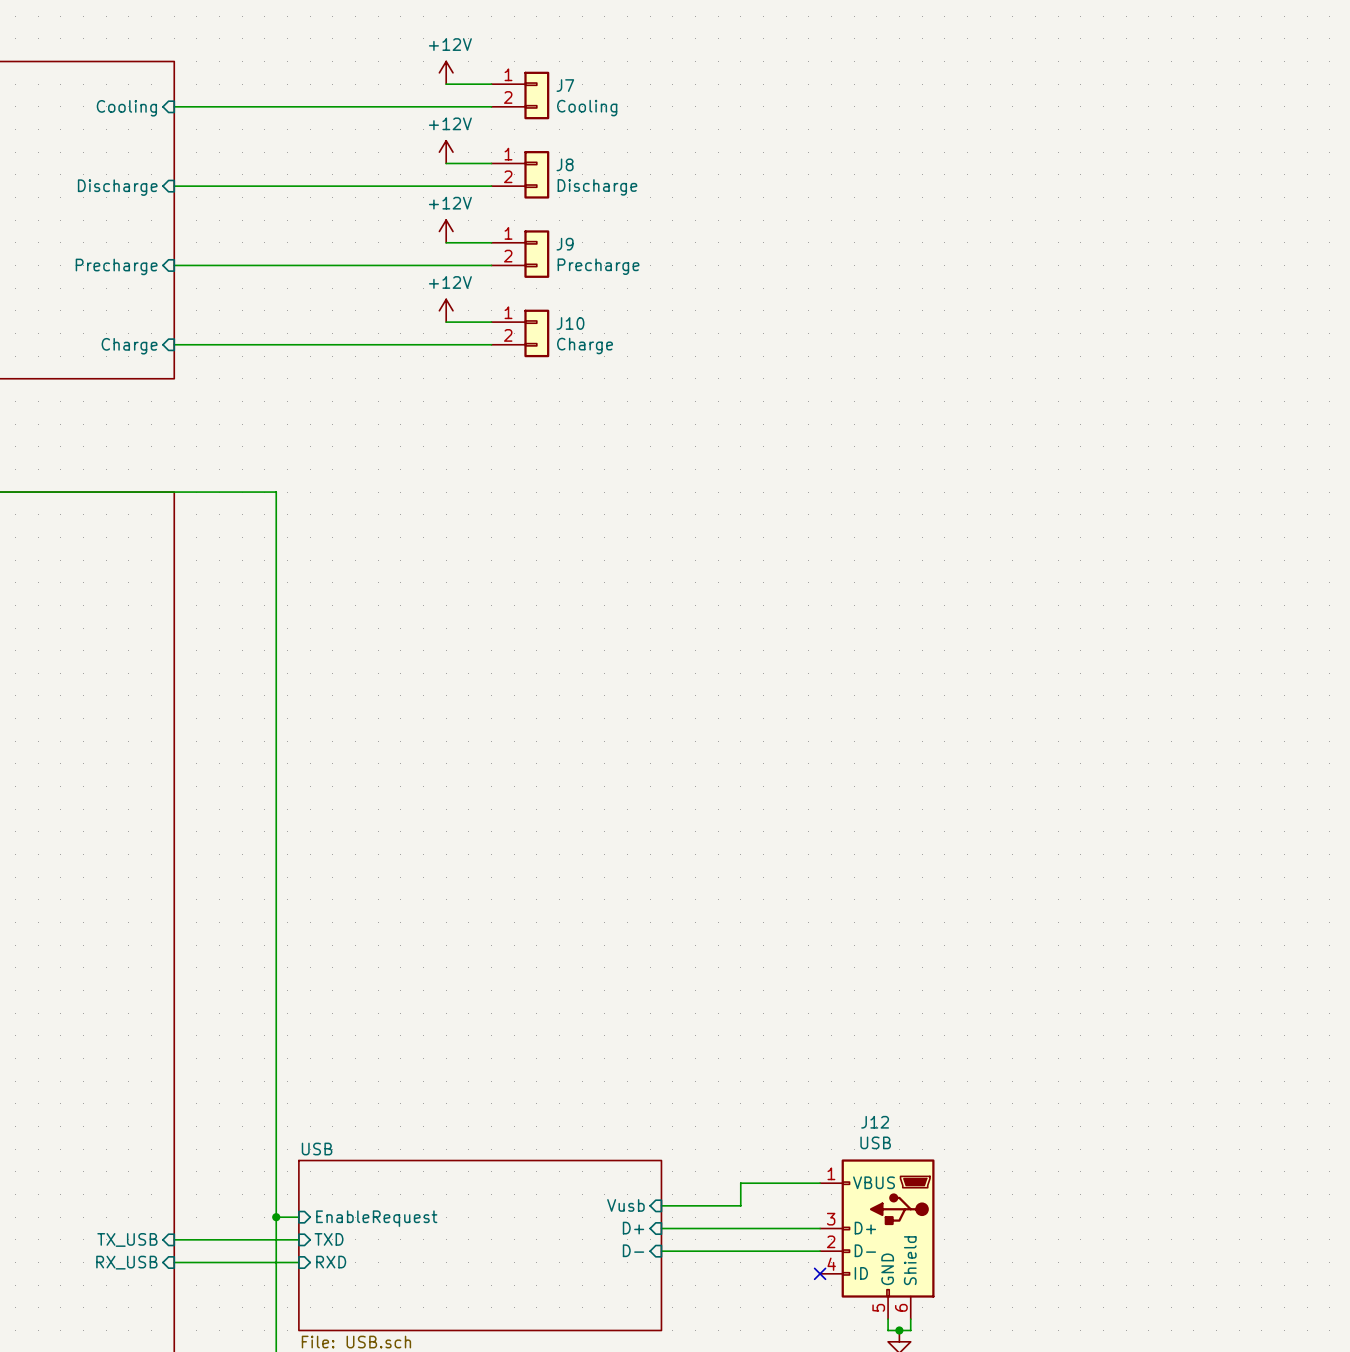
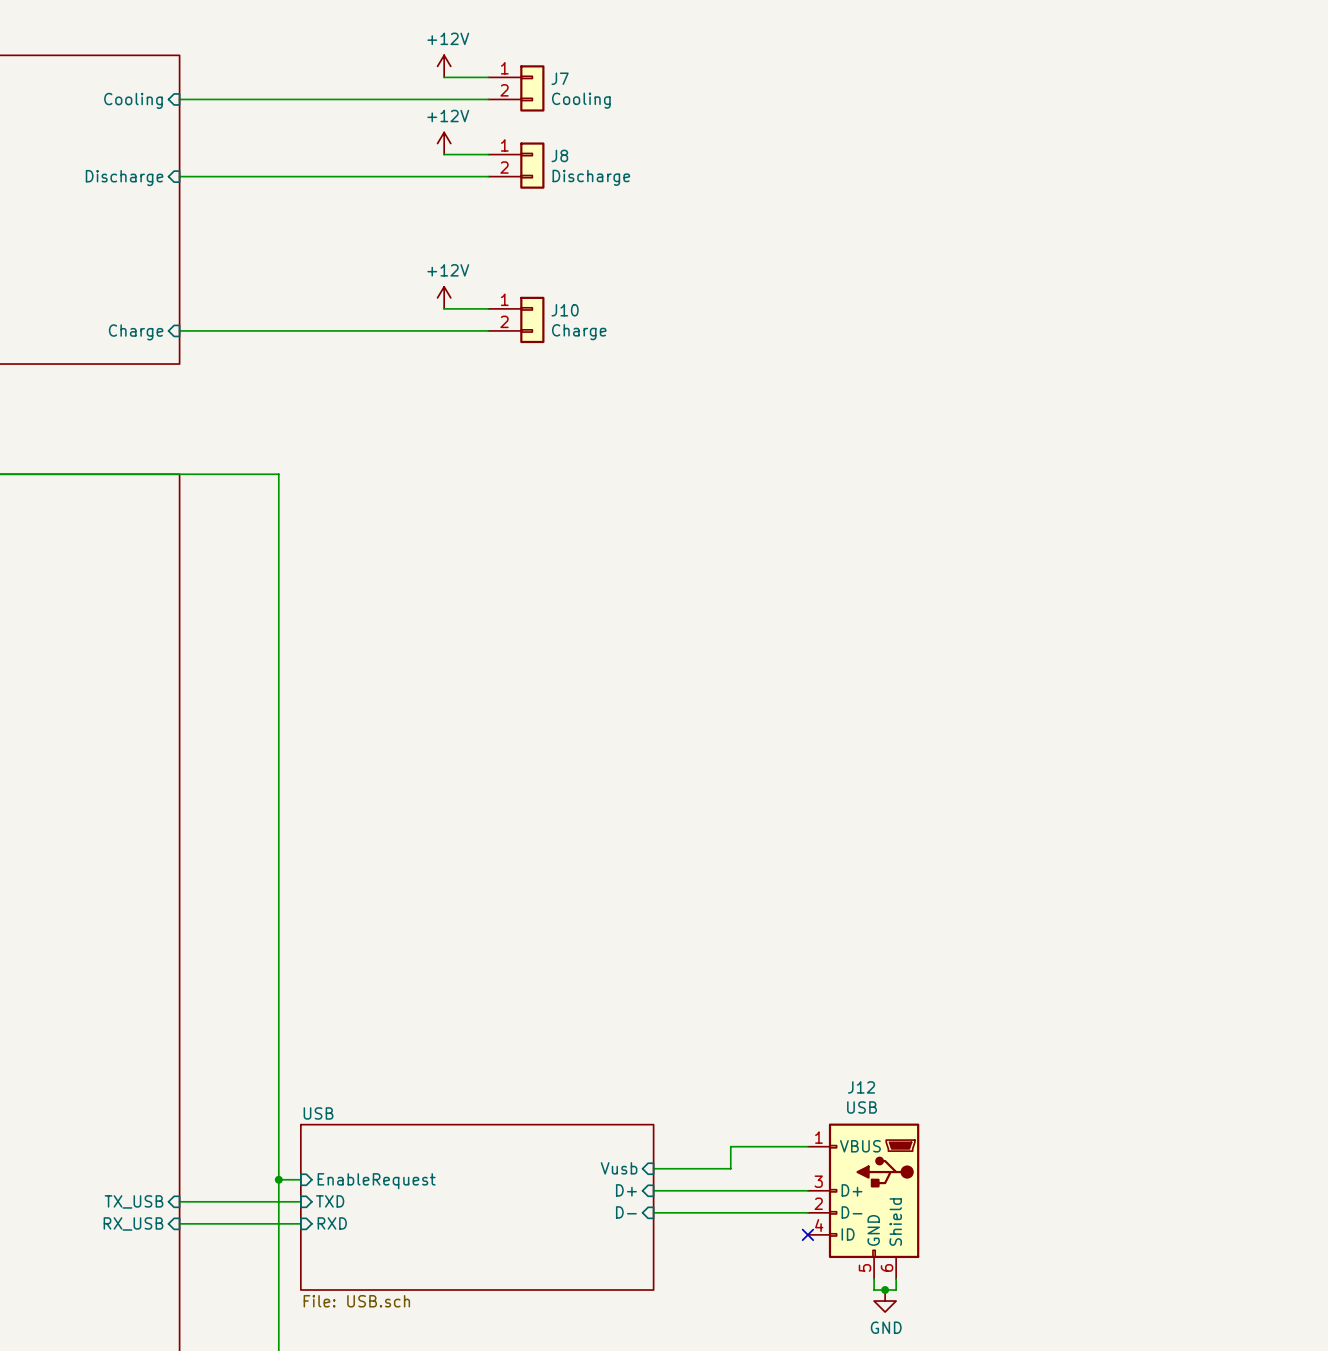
power symbol: +12V (446, 231) -> none
wire: (446, 242) (491, 242) -> none
J9: Precharge (520, 254) -> none
wire: (174, 265) (491, 265) -> none
sheet pin: Precharge (116, 266) -> none

